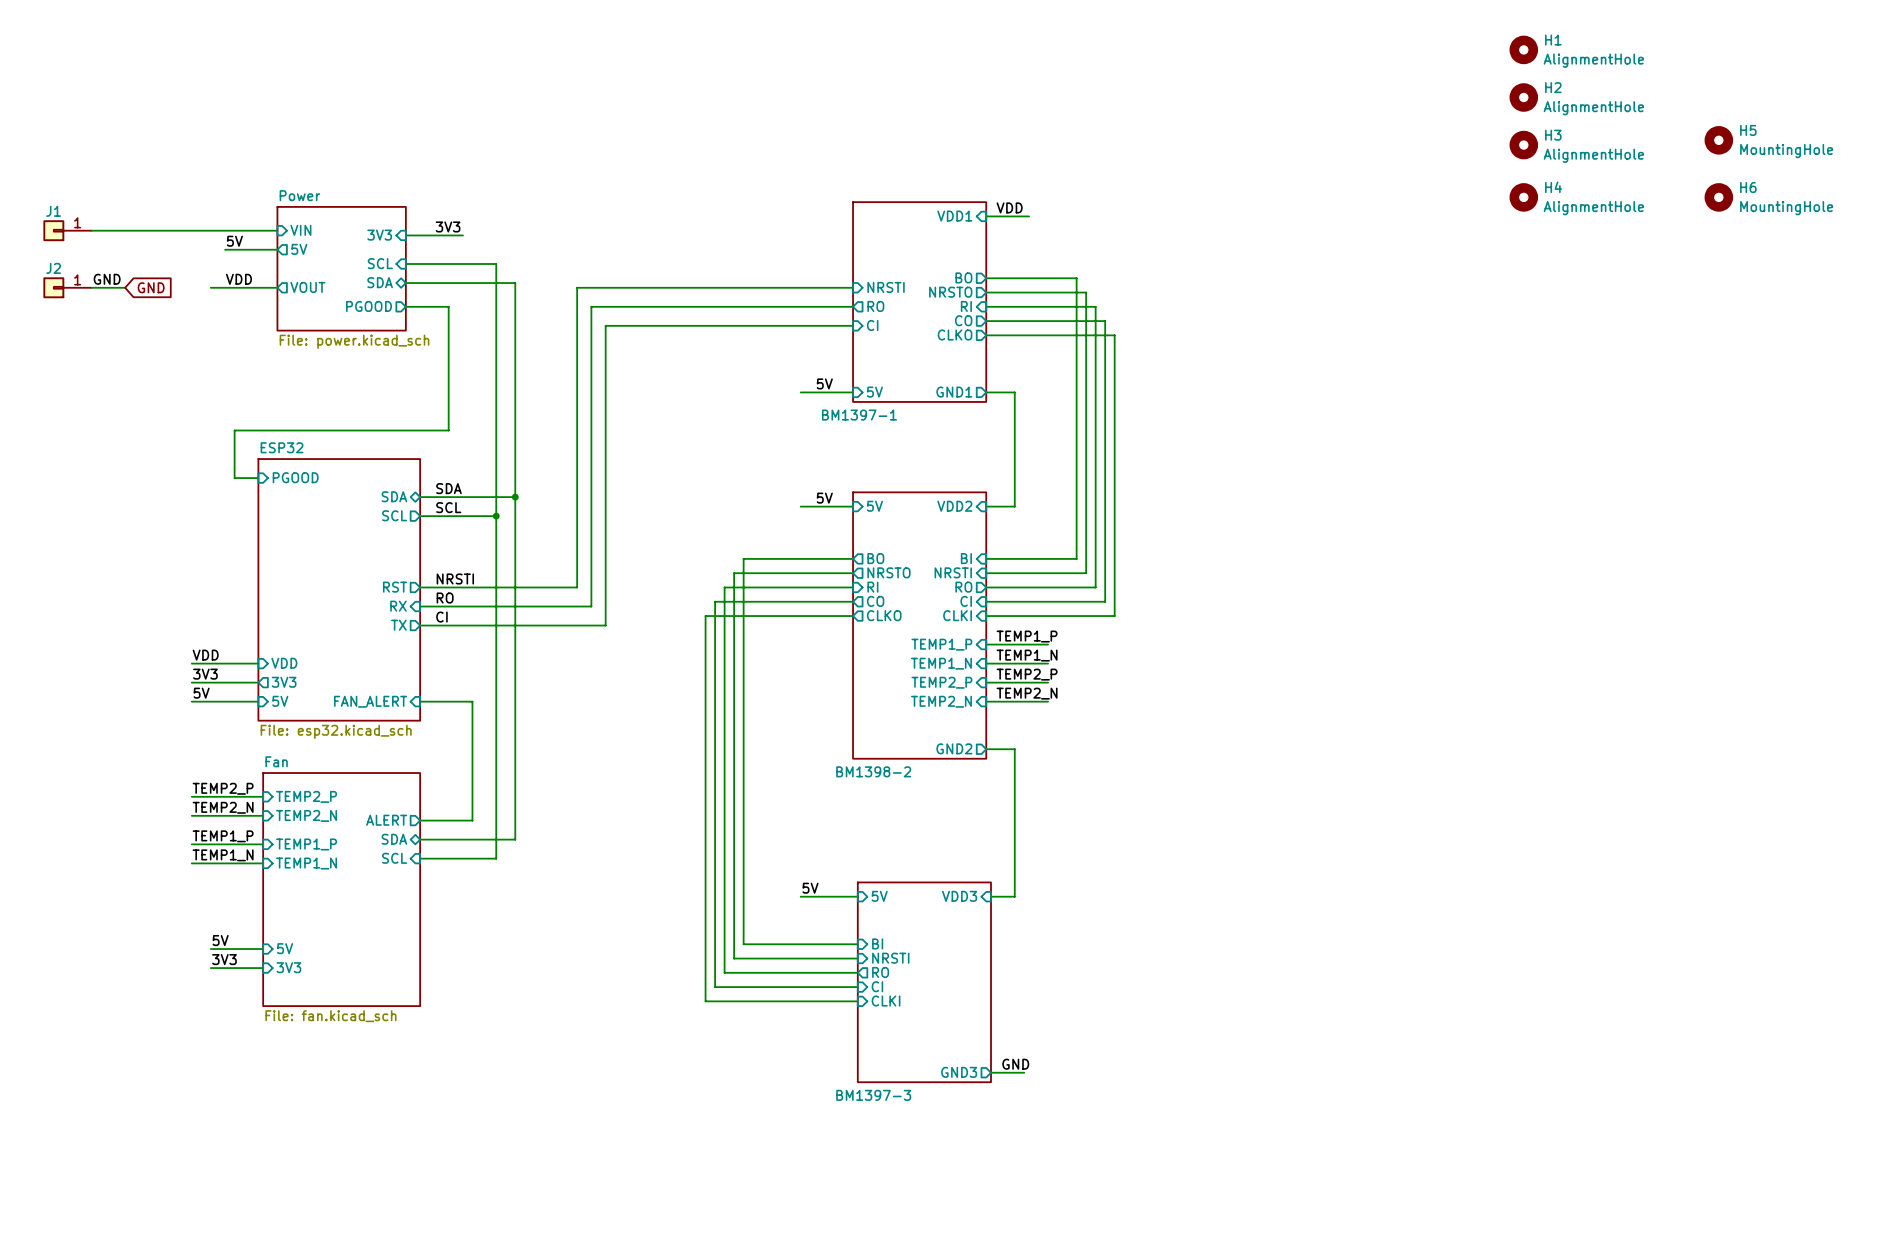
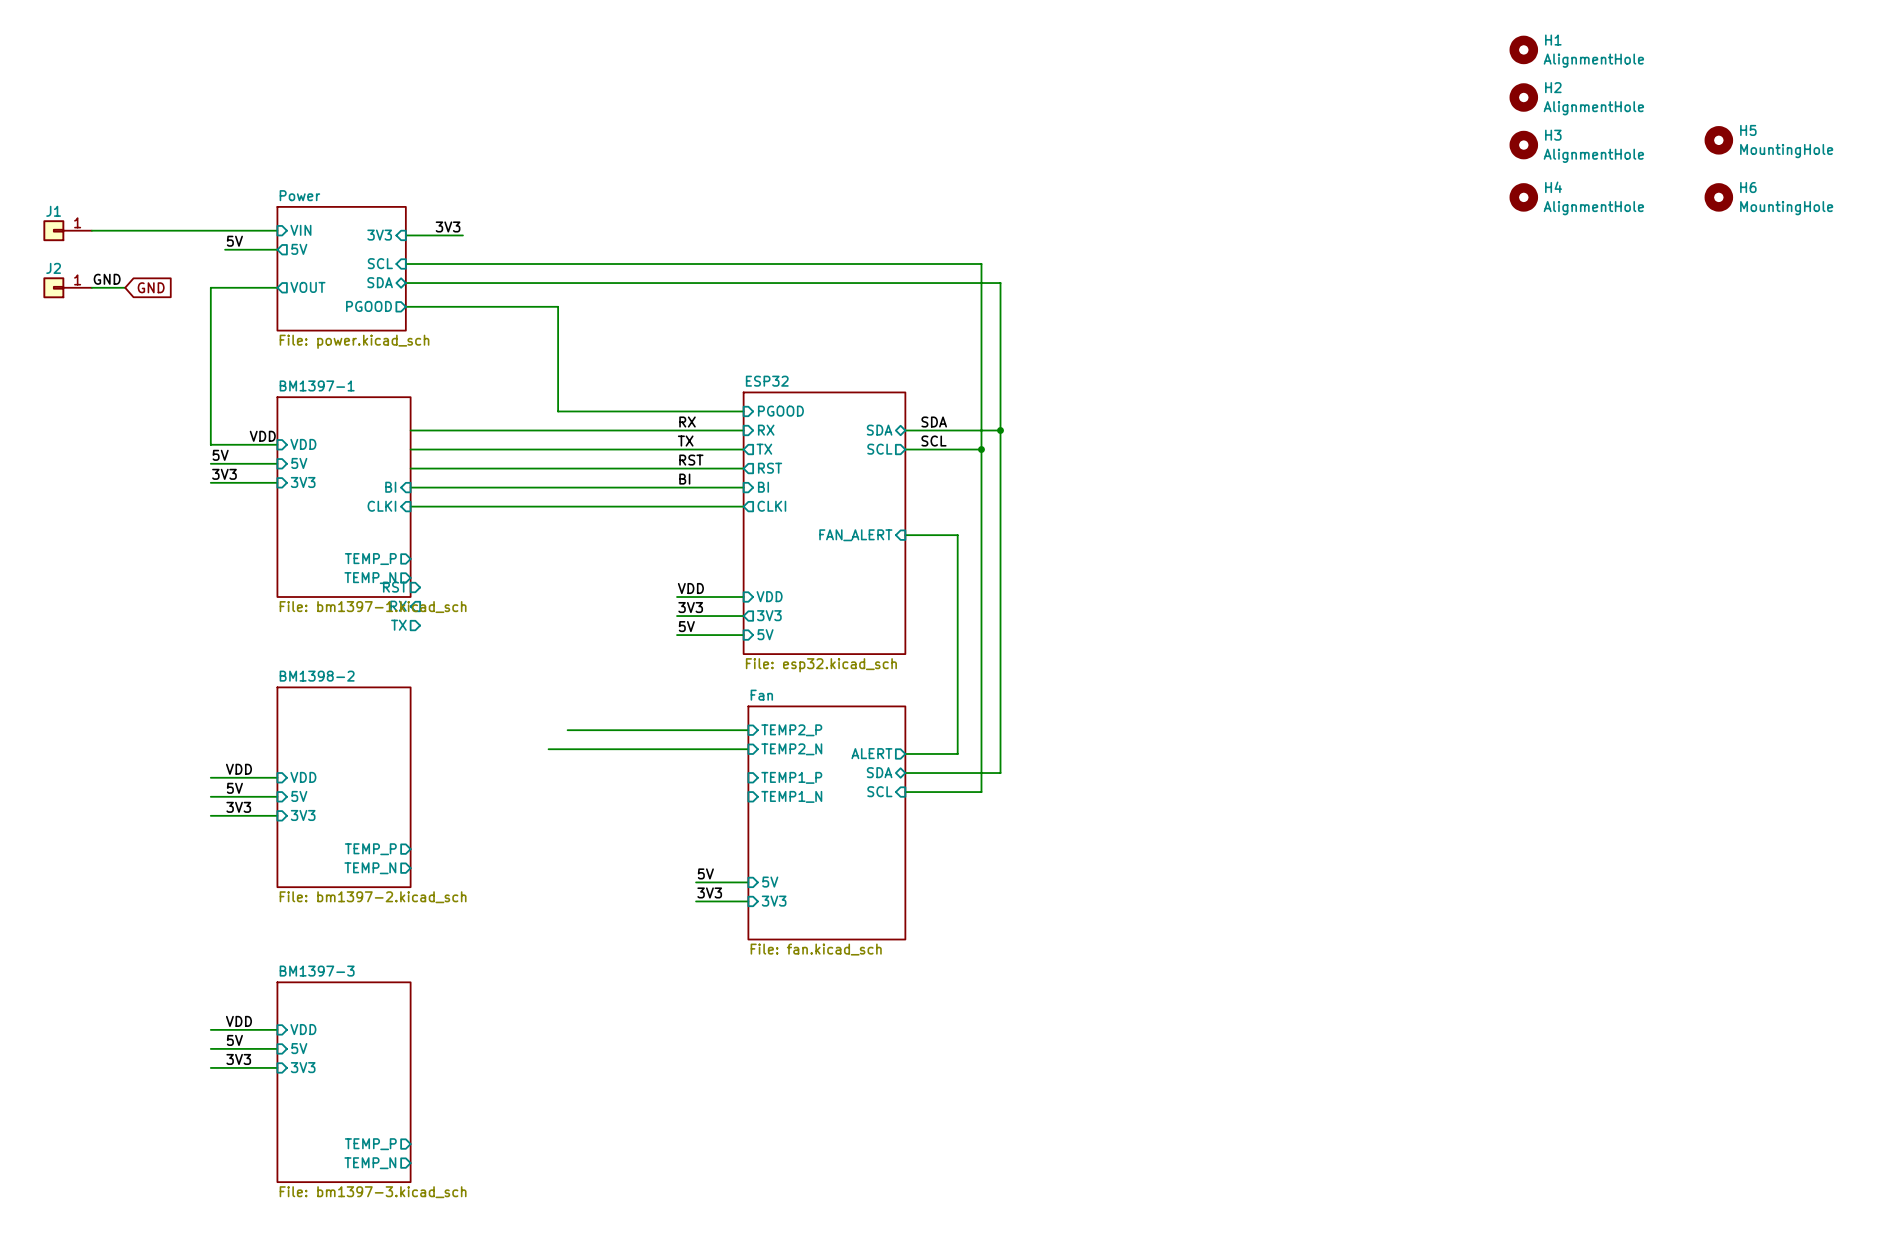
label: VDD (1009, 207) -> none
sheet pin: VDD1 (954, 216) -> none
wire: (986, 216) (1029, 216) -> none
wire: (496, 264) (496, 858) (420, 858) -> (496, 264) (981, 264) (981, 792) (905, 792)
sheet pin: BO (963, 277) -> none
wire: (986, 278) (1076, 278) (1076, 558) (986, 558) -> none
label: VDD (238, 279) -> none
wire: (515, 283) (515, 839) (420, 839) -> (515, 283) (1000, 283) (1000, 773) (905, 773)
wire: none -> (210, 287) (210, 444) (277, 444)
wire: (853, 287) (577, 287) (577, 587) (420, 587) -> none
sheet pin: NRSTI (886, 287) -> none
sheet pin: NRSTO (950, 292) -> none
wire: (986, 292) (1086, 292) (1086, 573) (986, 573) -> none
sheet BM1397-1 position: (919, 302) -> (344, 497)
wire: (448, 306) (448, 430) -> (448, 306) (558, 306) (558, 411) (743, 411)
wire: (853, 306) (591, 306) (591, 606) (420, 606) -> none
sheet pin: RO (875, 306) -> none
sheet pin: RI (966, 306) -> none
wire: (986, 306) (1095, 306) (1095, 587) (986, 587) -> none
sheet pin: CO (963, 320) -> none
wire: (986, 321) (1105, 321) (1105, 601) (986, 601) -> none
wire: (853, 325) (605, 325) (605, 625) (420, 625) -> none
sheet pin: CI (872, 325) -> none
sheet pin: CLKO (955, 335) -> none
wire: (986, 335) (1114, 335) (1114, 616) (986, 616) -> none
label: 5V (824, 383) -> none
sheet pin: 5V (874, 392) -> none
sheet pin: GND1 (954, 392) -> none
wire: (986, 392) (1014, 392) (1014, 506) (986, 506) -> none
sheet pin: none -> PGOOD (780, 411)
sheet BM1397-1 name position: BM1397-1 (859, 415) -> BM1397-1 (317, 385)
label: none -> RX (687, 422)
label: none -> SDA (934, 422)
wire: (410, 430) (234, 430) (234, 478) (258, 478) -> none
wire: none -> (448, 430) (743, 430)
sheet pin: none -> RX (766, 430)
sheet pin: none -> SDA (879, 430)
wire: none -> (905, 430) (1000, 430)
junction: none -> (1000, 430)
label: none -> VDD (262, 436)
label: none -> TX (685, 441)
label: none -> SCL (933, 441)
sheet pin: none -> VDD (303, 444)
wire: none -> (410, 449) (743, 449)
sheet pin: none -> TX (764, 449)
sheet pin: none -> SCL (879, 449)
wire: none -> (905, 449) (981, 449)
junction: none -> (981, 449)
label: none -> 5V (220, 455)
label: none -> RST (691, 460)
wire: none -> (210, 463) (277, 463)
sheet pin: none -> 5V (299, 463)
wire: none -> (410, 468) (743, 468)
sheet pin: none -> RST (770, 468)
label: none -> 3V3 (224, 474)
sheet pin: PGOOD (295, 477) -> none
label: none -> BI (684, 479)
sheet pin: none -> 3V3 (303, 482)
sheet pin: none -> BI (390, 487)
wire: none -> (410, 487) (743, 487)
sheet pin: none -> BI (763, 487)
label: SDA (448, 488) -> none
sheet BM1398-2 shape: [852, 491, 987, 760] -> [276, 686, 412, 888]
sheet pin: SDA (394, 496) -> none
wire: (420, 497) (515, 497) -> none
junction: (515, 497) -> none
label: 5V (824, 498) -> none
sheet pin: none -> CLKI (381, 506)
wire: none -> (410, 506) (743, 506)
sheet pin: none -> CLKI (771, 506)
wire: (800, 506) (853, 506) -> none
sheet pin: 5V (874, 506) -> none
sheet pin: VDD2 (954, 506) -> none
label: SCL (448, 507) -> none
sheet pin: SCL (394, 515) -> none
wire: (420, 516) (496, 516) -> none
junction: (496, 516) -> none
sheet pin: none -> FAN_ALERT (855, 535)
wire: none -> (905, 535) (957, 535) (957, 753) (905, 753)
wire: (853, 558) (743, 558) (743, 944) (857, 944) -> none
sheet pin: BO (875, 558) -> none
sheet pin: BI (966, 558) -> none
sheet pin: none -> TEMP_P (370, 559)
sheet pin: NRSTO (888, 572) -> none
sheet pin: NRSTI (953, 572) -> none
wire: (853, 573) (734, 573) (734, 958) (857, 958) -> none
sheet pin: none -> TEMP_N (370, 578)
label: NRSTI (455, 578) -> none
wire: (853, 587) (724, 587) (724, 972) (857, 972) -> none
sheet pin: RI (872, 587) -> none
sheet pin: RO (963, 587) -> none
label: none -> VDD (690, 588)
sheet ESP32 position: (339, 589) -> (824, 523)
sheet pin: none -> VDD (769, 596)
wire: none -> (677, 597) (743, 597)
label: RO (445, 598) -> none
wire: (853, 601) (715, 601) (715, 987) (857, 987) -> none
sheet pin: CO (875, 601) -> none
sheet pin: CI (966, 601) -> none
sheet BM1397-1 value: none -> File: bm1397-1.kicad_sch (373, 607)
label: none -> 3V3 (690, 607)
sheet pin: none -> 3V3 (769, 615)
sheet pin: CLKO (884, 615) -> none
sheet pin: CLKI (957, 615) -> none
wire: (705, 616) (705, 1001) (857, 1001) -> (705, 616) (677, 616)
wire: (743, 616) (853, 616) -> none
label: CI (441, 617) -> none
label: none -> 5V (686, 626)
sheet pin: none -> 5V (765, 634)
wire: none -> (677, 635) (743, 635)
label: TEMP1_P (1027, 636) -> none
sheet pin: TEMP1_P (941, 644) -> none
wire: (986, 644) (1048, 644) -> none
label: VDD (205, 655) -> none
label: TEMP1_N (1027, 655) -> none
wire: (191, 663) (258, 663) -> (210, 482) (277, 482)
sheet pin: VDD (284, 663) -> none
sheet pin: TEMP1_N (941, 663) -> none
wire: (986, 663) (1048, 663) -> none
label: 3V3 (205, 674) -> none
label: TEMP2_P (1027, 674) -> none
wire: (191, 682) (258, 682) -> none
sheet pin: 3V3 (284, 682) -> none
sheet pin: TEMP2_P (941, 682) -> none
wire: (986, 682) (1048, 682) -> none
label: 5V (201, 693) -> none
label: TEMP2_N (1027, 693) -> none
wire: (191, 701) (258, 701) -> (210, 777) (277, 777)
sheet pin: 5V (280, 701) -> none
sheet pin: FAN_ALERT (370, 701) -> none
wire: (420, 701) (472, 701) (472, 820) (420, 820) -> none
sheet pin: TEMP2_N (941, 701) -> none
wire: (986, 701) (1048, 701) -> none
wire: none -> (567, 730) (748, 730)
sheet pin: none -> TEMP2_P (791, 730)
sheet pin: GND2 (954, 748) -> none
wire: none -> (548, 749) (748, 749)
sheet pin: none -> TEMP2_N (791, 749)
wire: (986, 749) (1014, 749) (1014, 896) (990, 896) -> none
sheet pin: none -> ALERT (871, 753)
label: none -> VDD (238, 769)
sheet BM1398-2 name position: BM1398-2 (873, 771) -> BM1398-2 (317, 676)
sheet pin: none -> SDA (879, 772)
sheet pin: none -> VDD (303, 777)
sheet pin: none -> TEMP1_P (791, 777)
label: TEMP2_P (223, 788) -> none
label: none -> 5V (234, 788)
sheet pin: none -> SCL (879, 791)
wire: (191, 796) (210, 796) -> none
wire: none -> (263, 796) (277, 796)
sheet pin: none -> 5V (299, 796)
sheet pin: TEMP2_P (306, 796) -> none
sheet pin: none -> TEMP1_N (791, 796)
label: TEMP2_N (223, 807) -> none
label: none -> 3V3 (238, 807)
wire: (191, 815) (210, 815) -> none
wire: none -> (263, 815) (277, 815)
sheet pin: none -> 3V3 (303, 815)
sheet pin: TEMP2_N (306, 815) -> none
sheet pin: ALERT (386, 820) -> none
sheet Fan: none -> File: fan.kicad_sch (826, 822)
label: TEMP1_P (223, 836) -> none
sheet pin: SDA (394, 839) -> none
wire: (191, 844) (263, 844) -> none
sheet pin: TEMP1_P (306, 844) -> none
sheet pin: none -> TEMP_P (370, 849)
label: TEMP1_N (223, 855) -> none
sheet pin: SCL (394, 858) -> none
wire: (191, 863) (263, 863) -> none
sheet pin: TEMP1_N (306, 863) -> none
sheet pin: none -> TEMP_N (370, 868)
wire: none -> (696, 882) (748, 882)
label position: 5V (810, 888) -> 5V (705, 873)
sheet Fan: File: fan.kicad_sch (341, 889) -> none
label: none -> 3V3 (709, 892)
wire: (800, 896) (857, 896) -> none
sheet pin position: 5V (879, 896) -> 5V (770, 882)
sheet pin: VDD3 (959, 896) -> none
sheet BM1398-2 value: none -> File: bm1397-2.kicad_sch (373, 897)
wire: none -> (696, 901) (748, 901)
sheet pin: none -> 3V3 (774, 901)
label: 5V (220, 940) -> none
sheet pin: BI (877, 943) -> none
sheet pin: 5V (285, 948) -> none
wire: (210, 949) (263, 949) -> none
sheet pin: NRSTI (890, 958) -> none
label: 3V3 (224, 959) -> none
sheet pin: 3V3 (288, 967) -> none
wire: (210, 968) (263, 968) -> none
sheet pin: RO (880, 972) -> none
sheet BM1397-3 position: (924, 982) -> (344, 1082)
sheet pin: CI (877, 986) -> none
sheet pin: CLKI (886, 1001) -> none
label: none -> VDD (238, 1021)
wire: none -> (210, 1029) (277, 1029)
sheet pin: none -> VDD (303, 1029)
label: none -> 5V (234, 1040)
wire: none -> (210, 1048) (277, 1048)
sheet pin: none -> 5V (299, 1048)
label: none -> 3V3 (238, 1059)
label: GND (1015, 1064) -> none
wire: none -> (210, 1067) (277, 1067)
sheet pin: none -> 3V3 (303, 1067)
sheet pin: GND3 (959, 1072) -> none
wire: (990, 1072) (1024, 1072) -> none
sheet BM1397-3 name position: BM1397-3 (873, 1095) -> BM1397-3 (317, 971)
sheet pin: none -> TEMP_P (370, 1144)
sheet pin: none -> TEMP_N (370, 1163)
sheet BM1397-3 value: none -> File: bm1397-3.kicad_sch (373, 1192)

